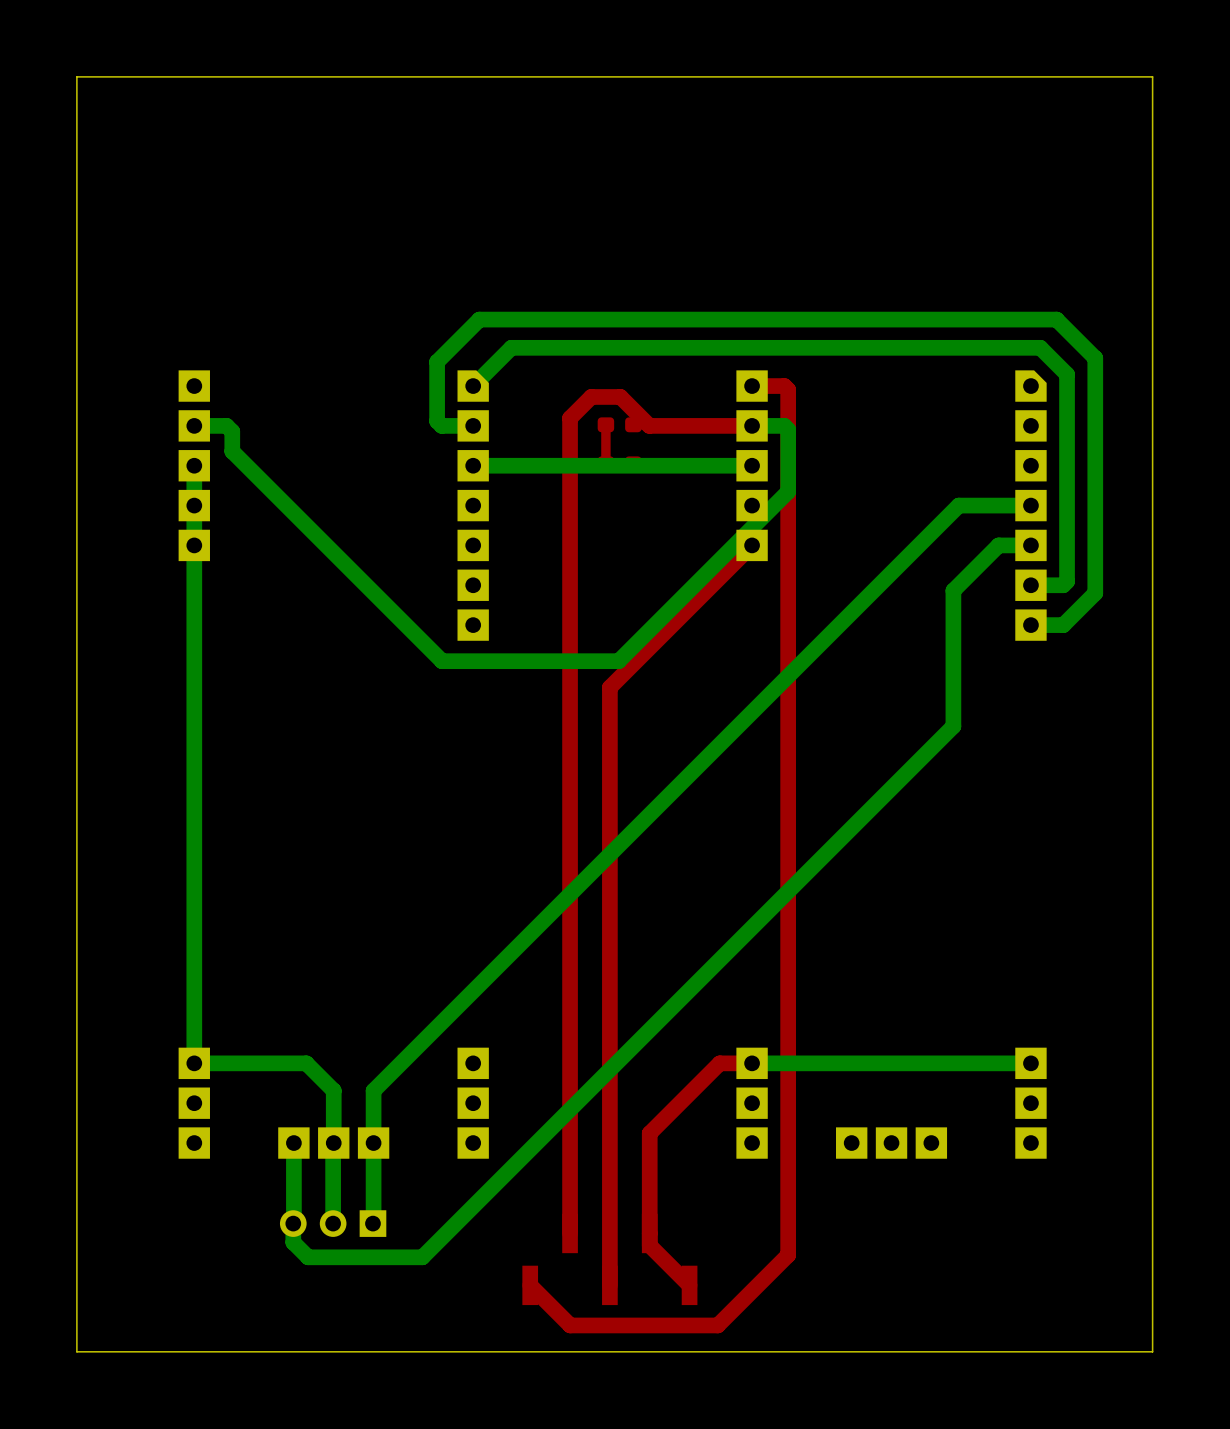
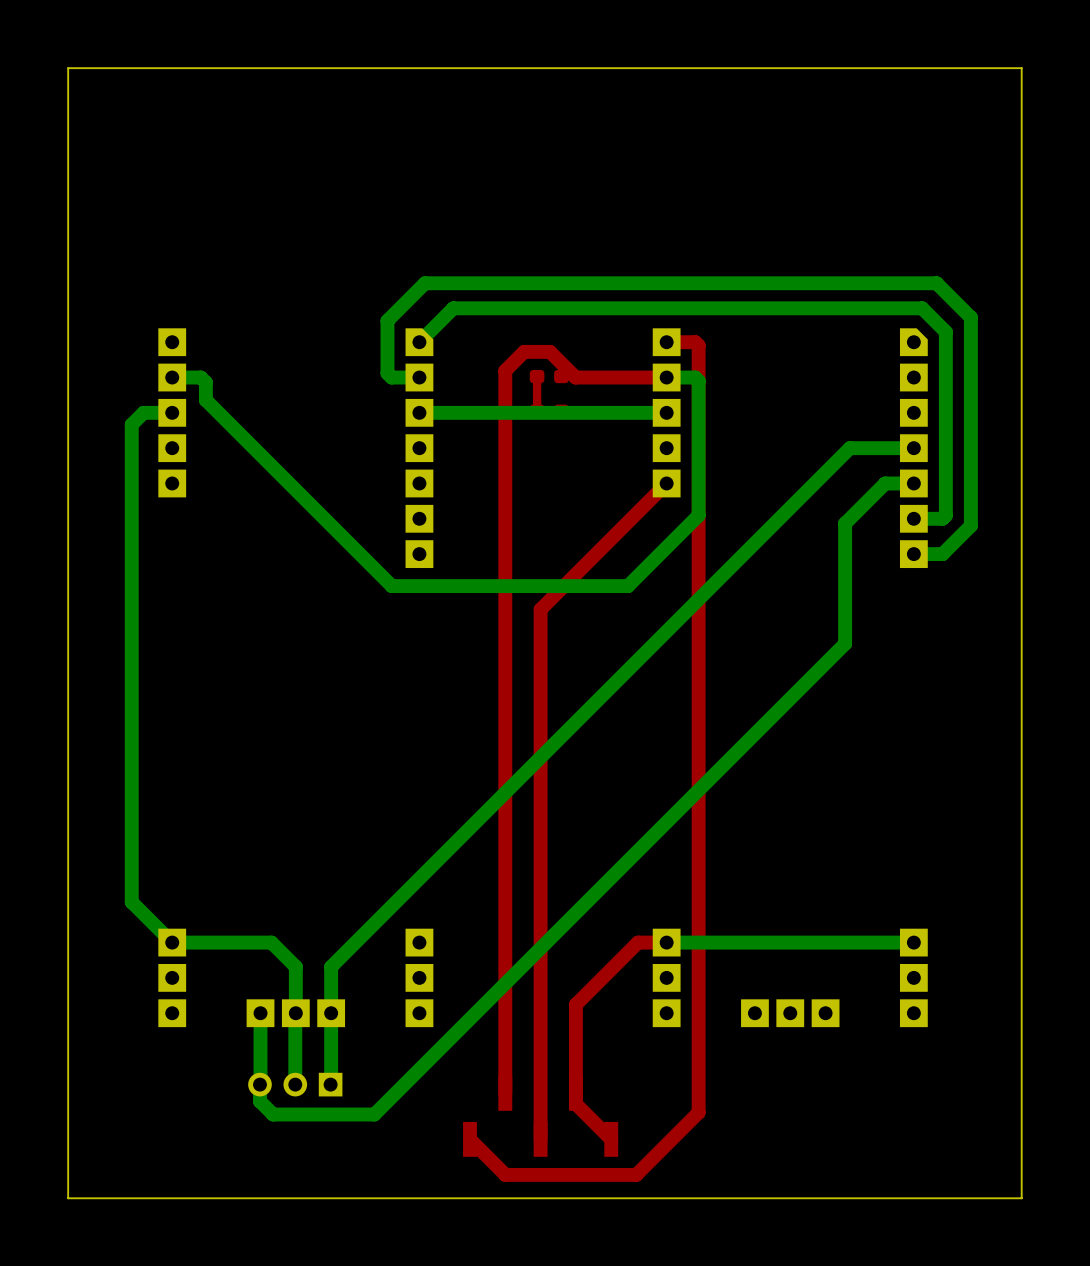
bottom track: (194, 465) (194, 1063) -> (172, 412) (143, 412) (131, 424) (131, 902) (172, 942)
bottom track: (788, 491) (618, 661) -> (698, 435) (698, 515) (628, 586) (548, 586)

